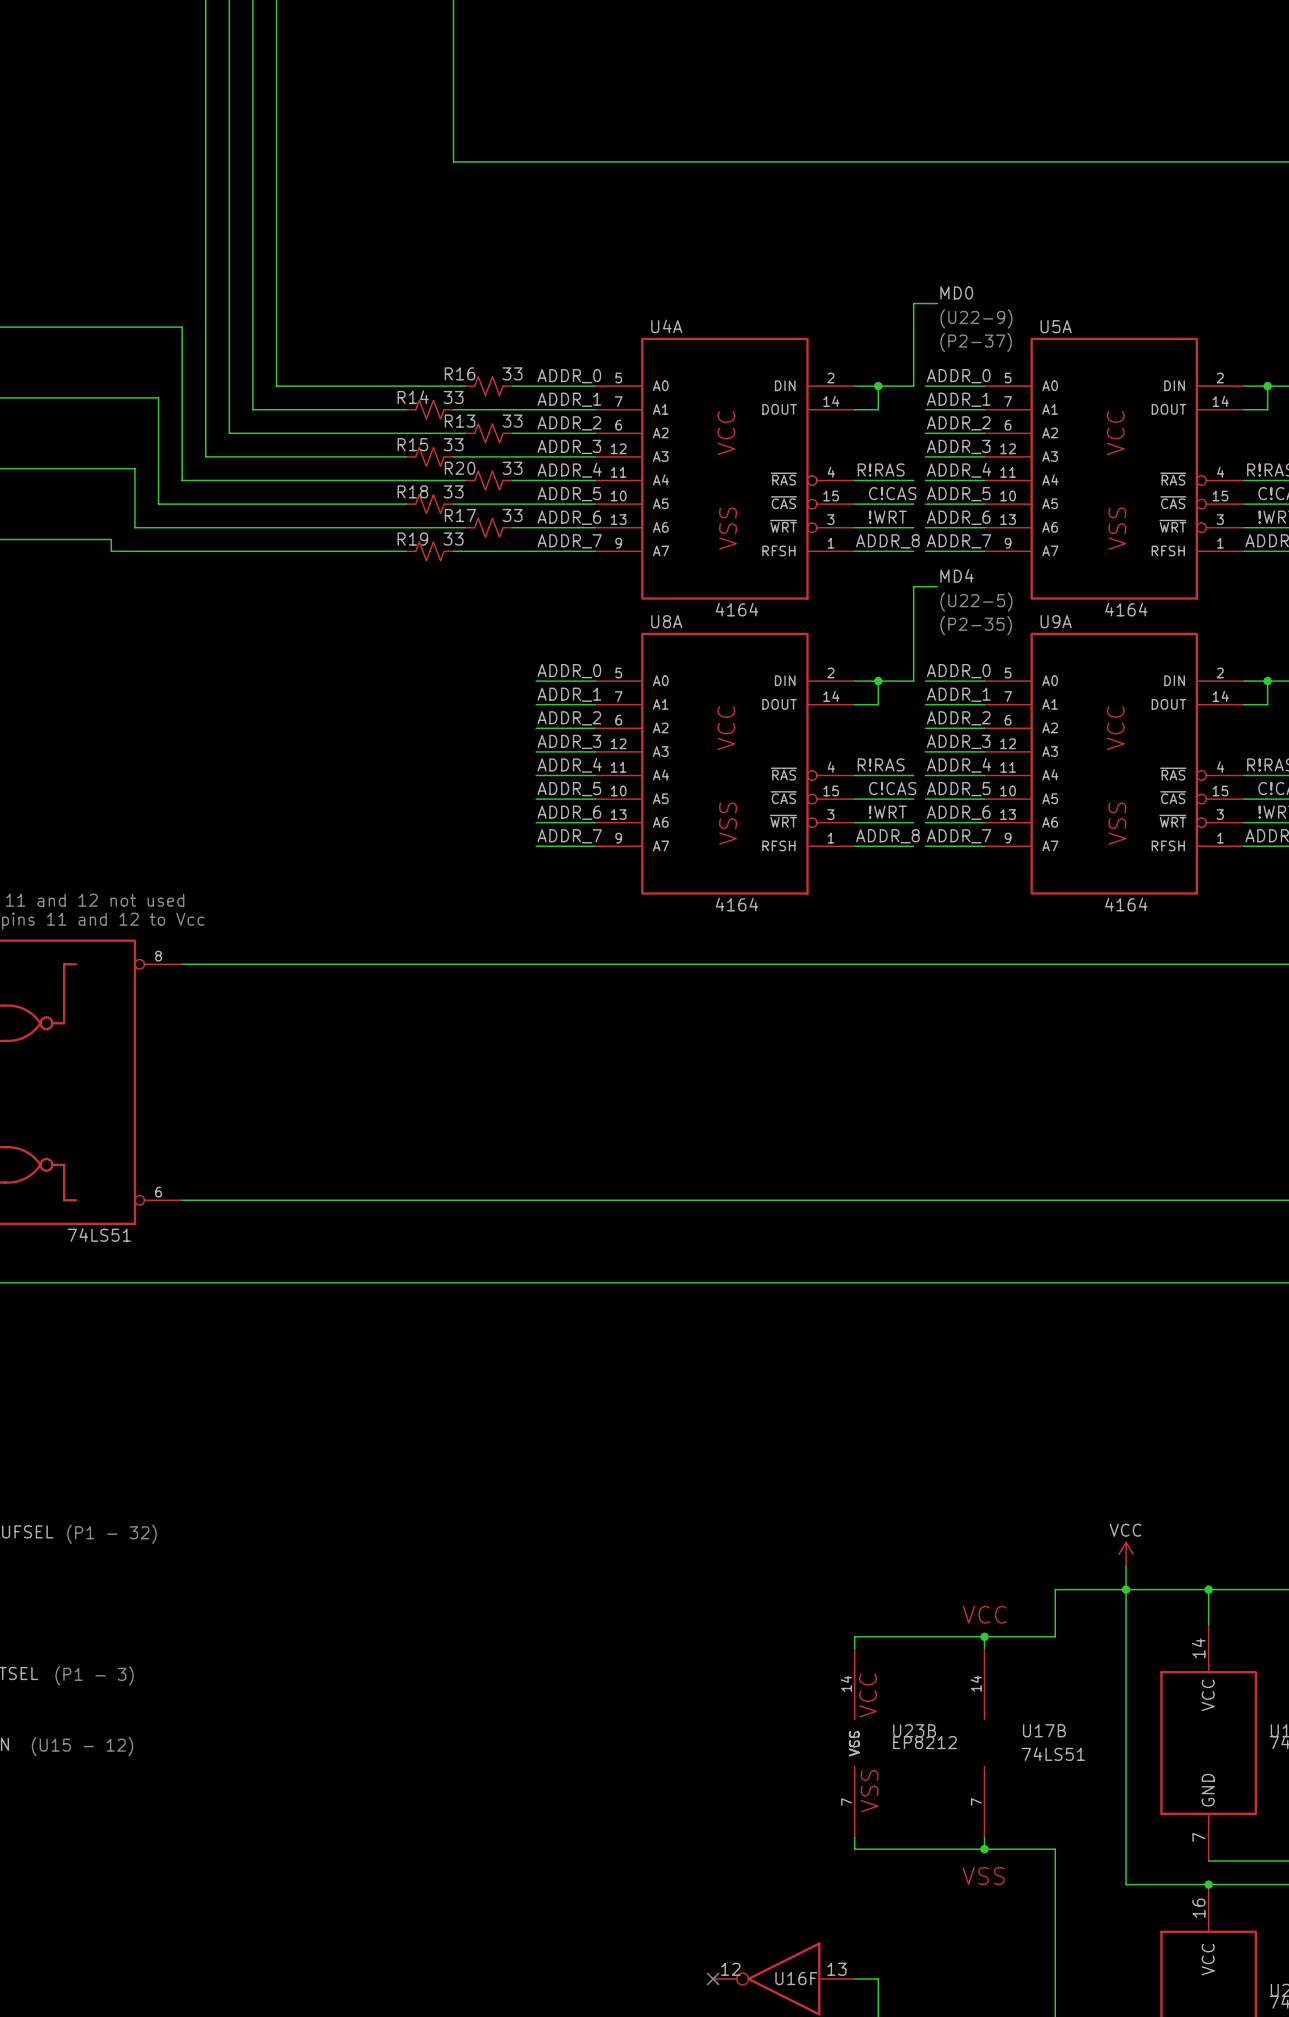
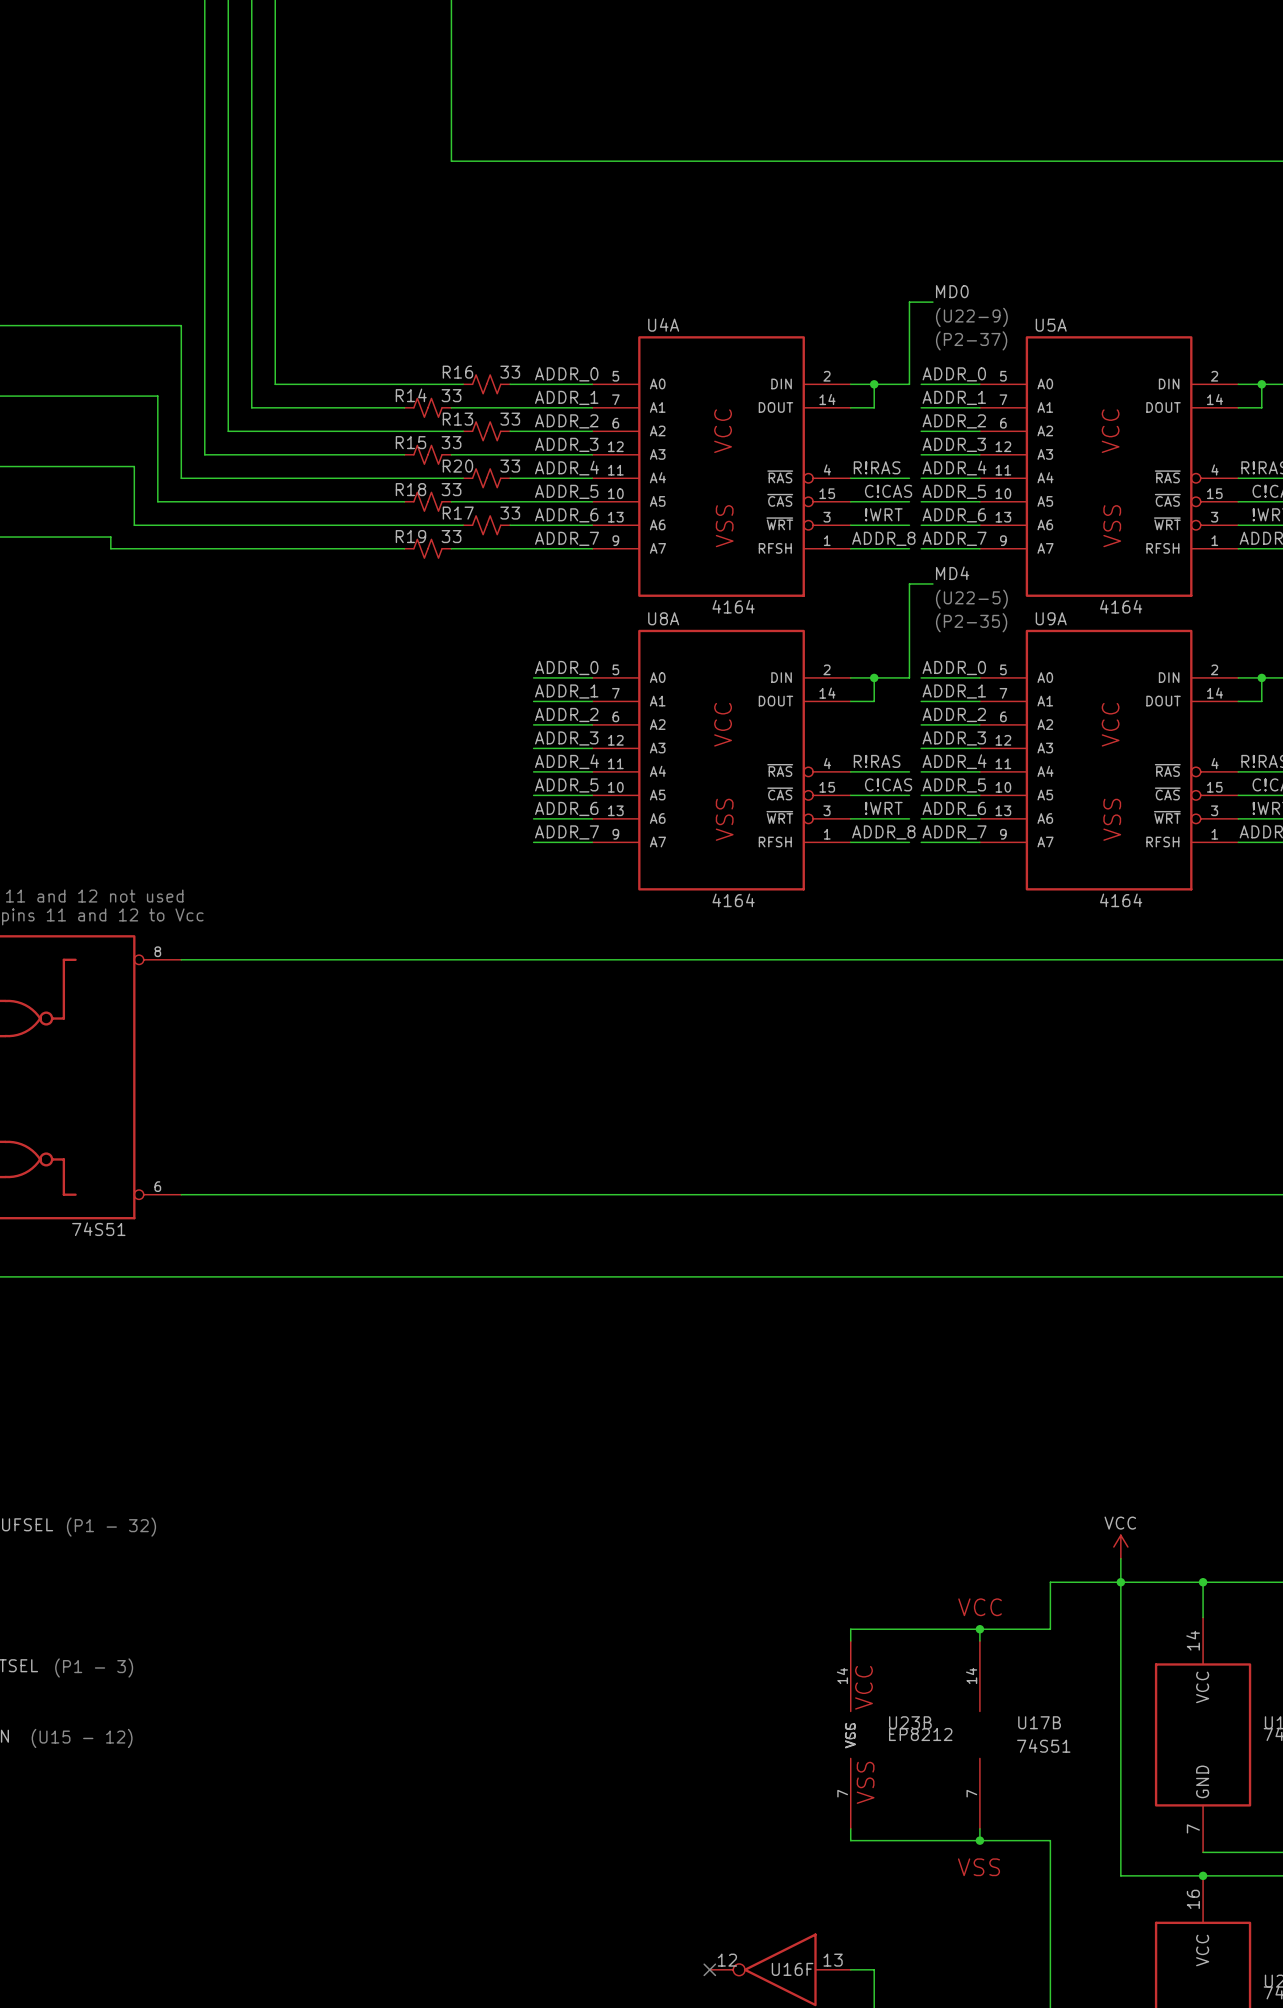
part value: 74LS51 (99, 1234) -> 74S51 (98, 1229)
U17B value: 74LS51 (1053, 1754) -> 74S51 (1043, 1745)

